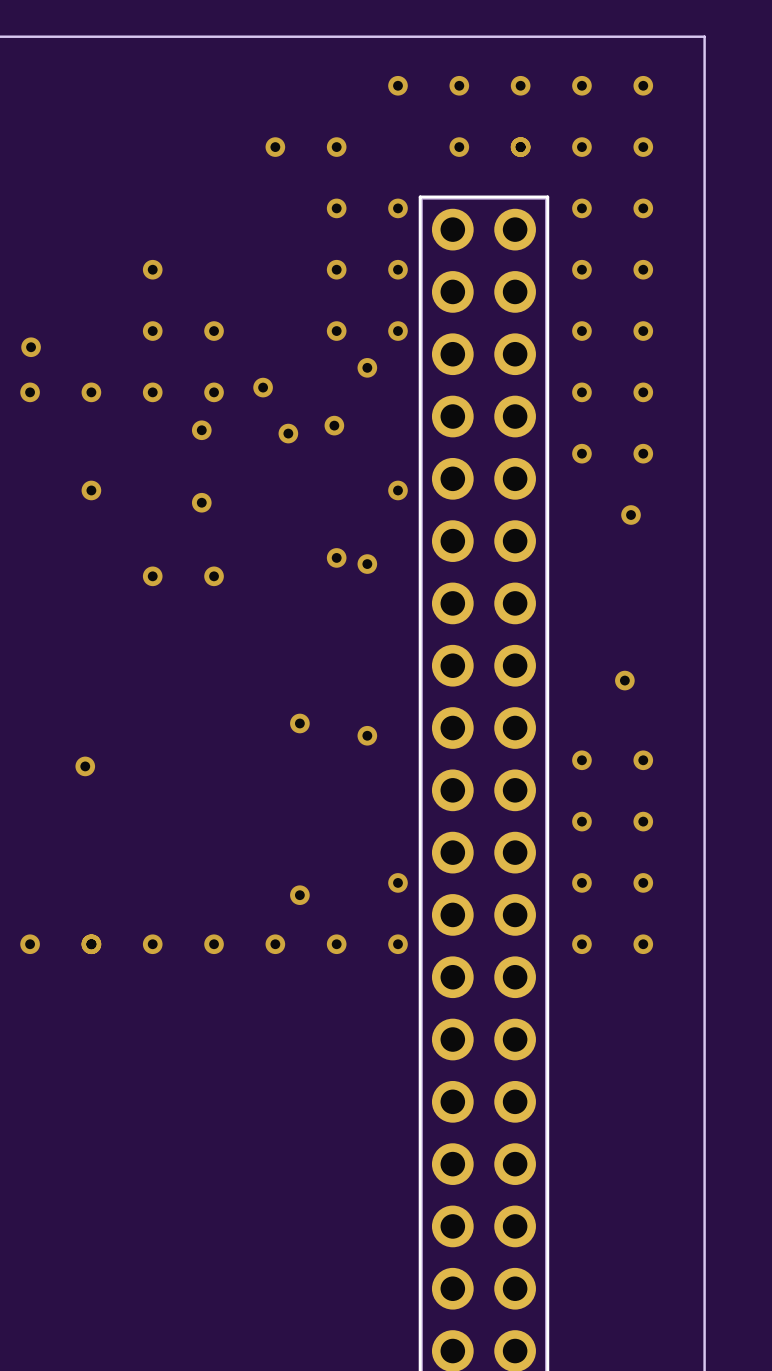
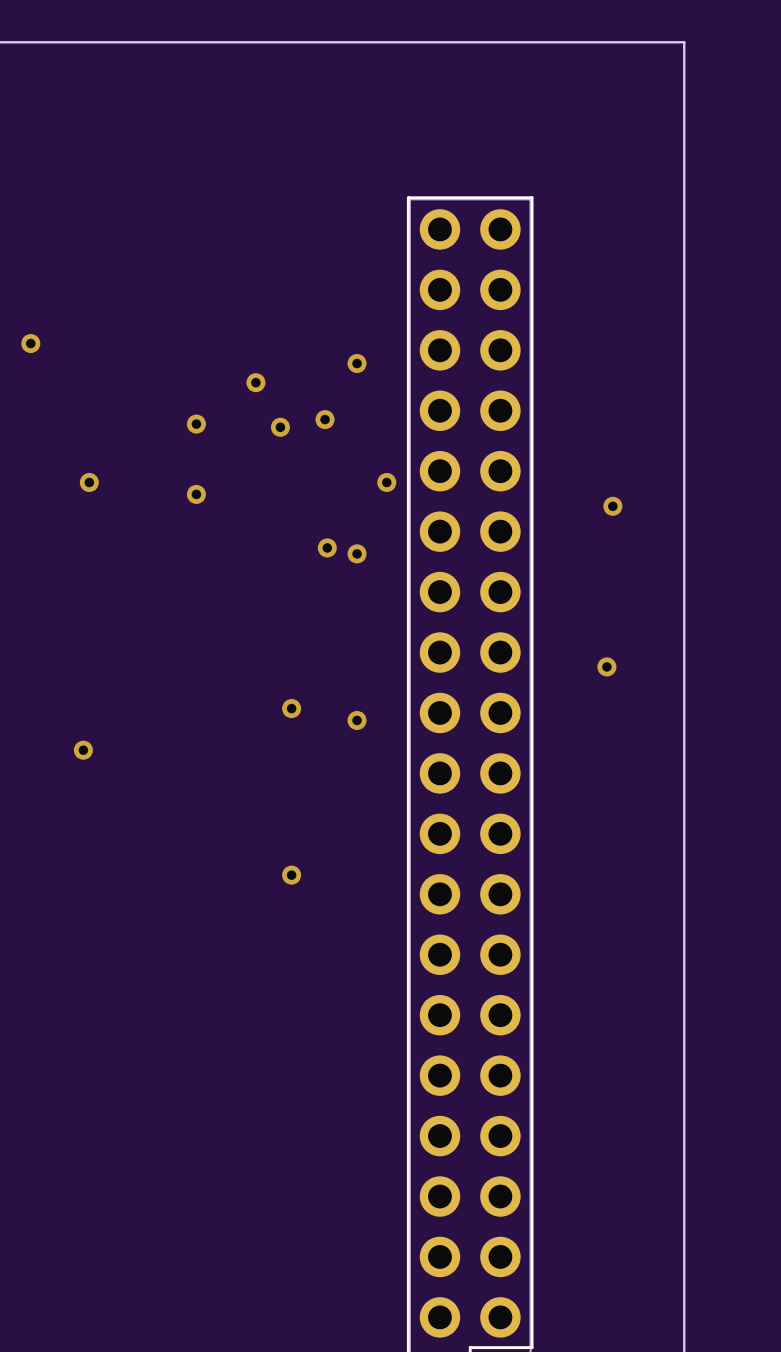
via: (397, 85) -> none
via: (459, 85) -> none
via: (520, 85) -> none
via: (581, 85) -> none
via: (643, 85) -> none
via: (275, 147) -> none
via: (336, 147) -> none
via: (459, 147) -> none
via: (520, 147) -> none
via: (581, 147) -> none
via: (643, 147) -> none
via: (336, 208) -> none
via: (397, 208) -> none
via: (581, 208) -> none
via: (643, 208) -> none
via: (152, 269) -> none
via: (336, 269) -> none
via: (397, 269) -> none
via: (581, 269) -> none
via: (643, 269) -> none
via: (152, 331) -> none
via: (214, 331) -> none
via: (336, 331) -> none
via: (397, 331) -> none
via: (581, 331) -> none
via: (643, 331) -> none
via: (30, 392) -> none
via: (91, 392) -> none
via: (152, 392) -> none
via: (214, 392) -> none
via: (581, 392) -> none
via: (643, 392) -> none
via: (581, 453) -> none
via: (643, 453) -> none
via: (152, 576) -> none
via: (214, 576) -> none
via: (581, 760) -> none
via: (643, 760) -> none
via: (581, 821) -> none
via: (643, 821) -> none
via: (397, 882) -> none
via: (581, 882) -> none
via: (643, 882) -> none
via: (30, 944) -> none
via: (91, 944) -> none
via: (152, 944) -> none
via: (214, 944) -> none
via: (275, 944) -> none
via: (336, 944) -> none
via: (397, 944) -> none
via: (581, 944) -> none
via: (643, 944) -> none

